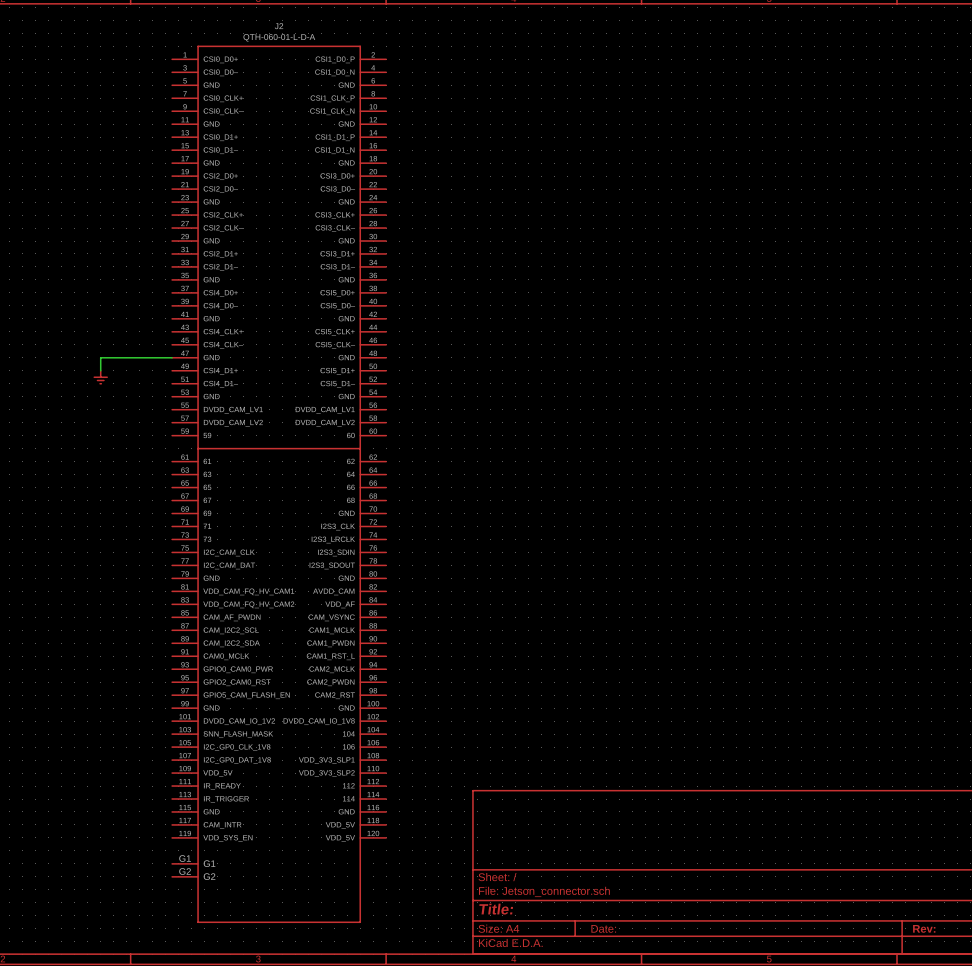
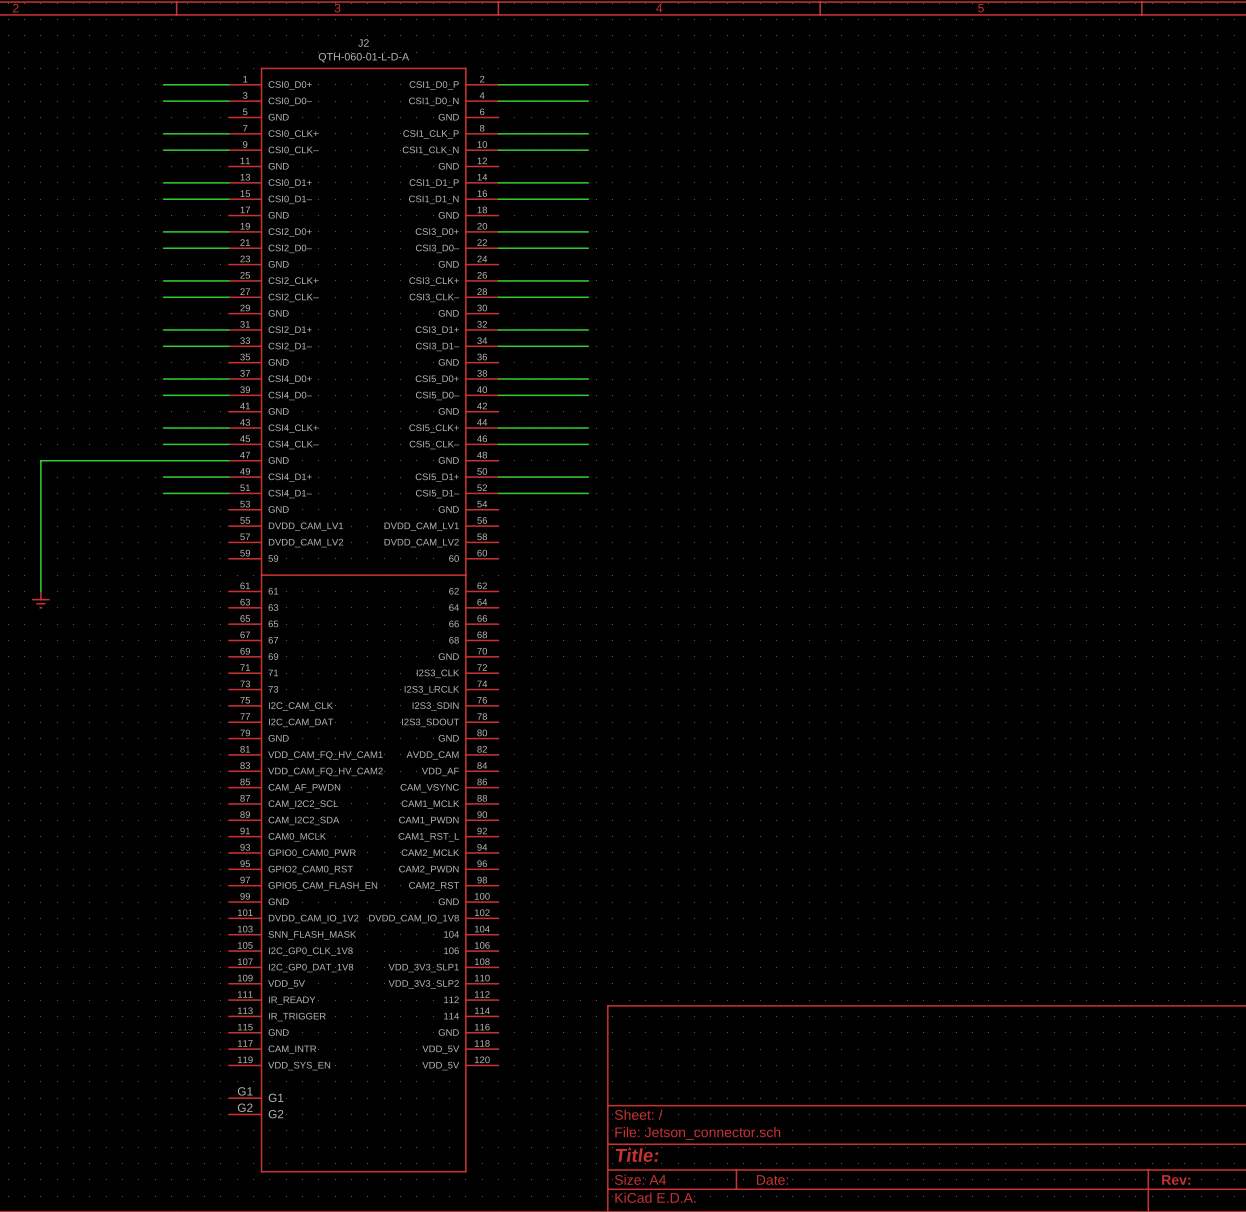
wire: none -> (163, 84) (228, 84)
wire: none -> (498, 84) (588, 84)
wire: none -> (163, 101) (228, 101)
wire: none -> (498, 101) (588, 101)
wire: none -> (163, 133) (228, 133)
wire: none -> (498, 133) (588, 133)
wire: none -> (163, 150) (228, 150)
wire: none -> (498, 150) (588, 150)
wire: none -> (163, 182) (228, 182)
wire: none -> (498, 182) (588, 182)
wire: none -> (163, 199) (228, 199)
wire: none -> (498, 199) (588, 199)
wire: none -> (163, 231) (228, 231)
wire: none -> (498, 231) (588, 231)
wire: none -> (163, 248) (228, 248)
wire: none -> (498, 248) (588, 248)
wire: none -> (163, 280) (228, 280)
wire: none -> (498, 280) (588, 280)
wire: none -> (163, 297) (228, 297)
wire: none -> (498, 297) (588, 297)
wire: none -> (163, 329) (228, 329)
wire: none -> (498, 329) (588, 329)
wire: none -> (163, 346) (228, 346)
wire: none -> (498, 346) (588, 346)
wire: none -> (163, 379) (228, 379)
wire: none -> (498, 379) (588, 379)
wire: none -> (163, 395) (228, 395)
wire: none -> (498, 395) (588, 395)
wire: none -> (163, 428) (228, 428)
wire: none -> (498, 428) (588, 428)
wire: none -> (163, 444) (228, 444)
wire: none -> (498, 444) (588, 444)
wire: (100, 357) (100, 370) -> (138, 460) (40, 460) (40, 591)
wire: none -> (163, 477) (228, 477)
wire: none -> (498, 477) (588, 477)
power symbol position: (100, 377) -> (40, 599)
wire: none -> (163, 493) (228, 493)
wire: none -> (498, 493) (588, 493)

